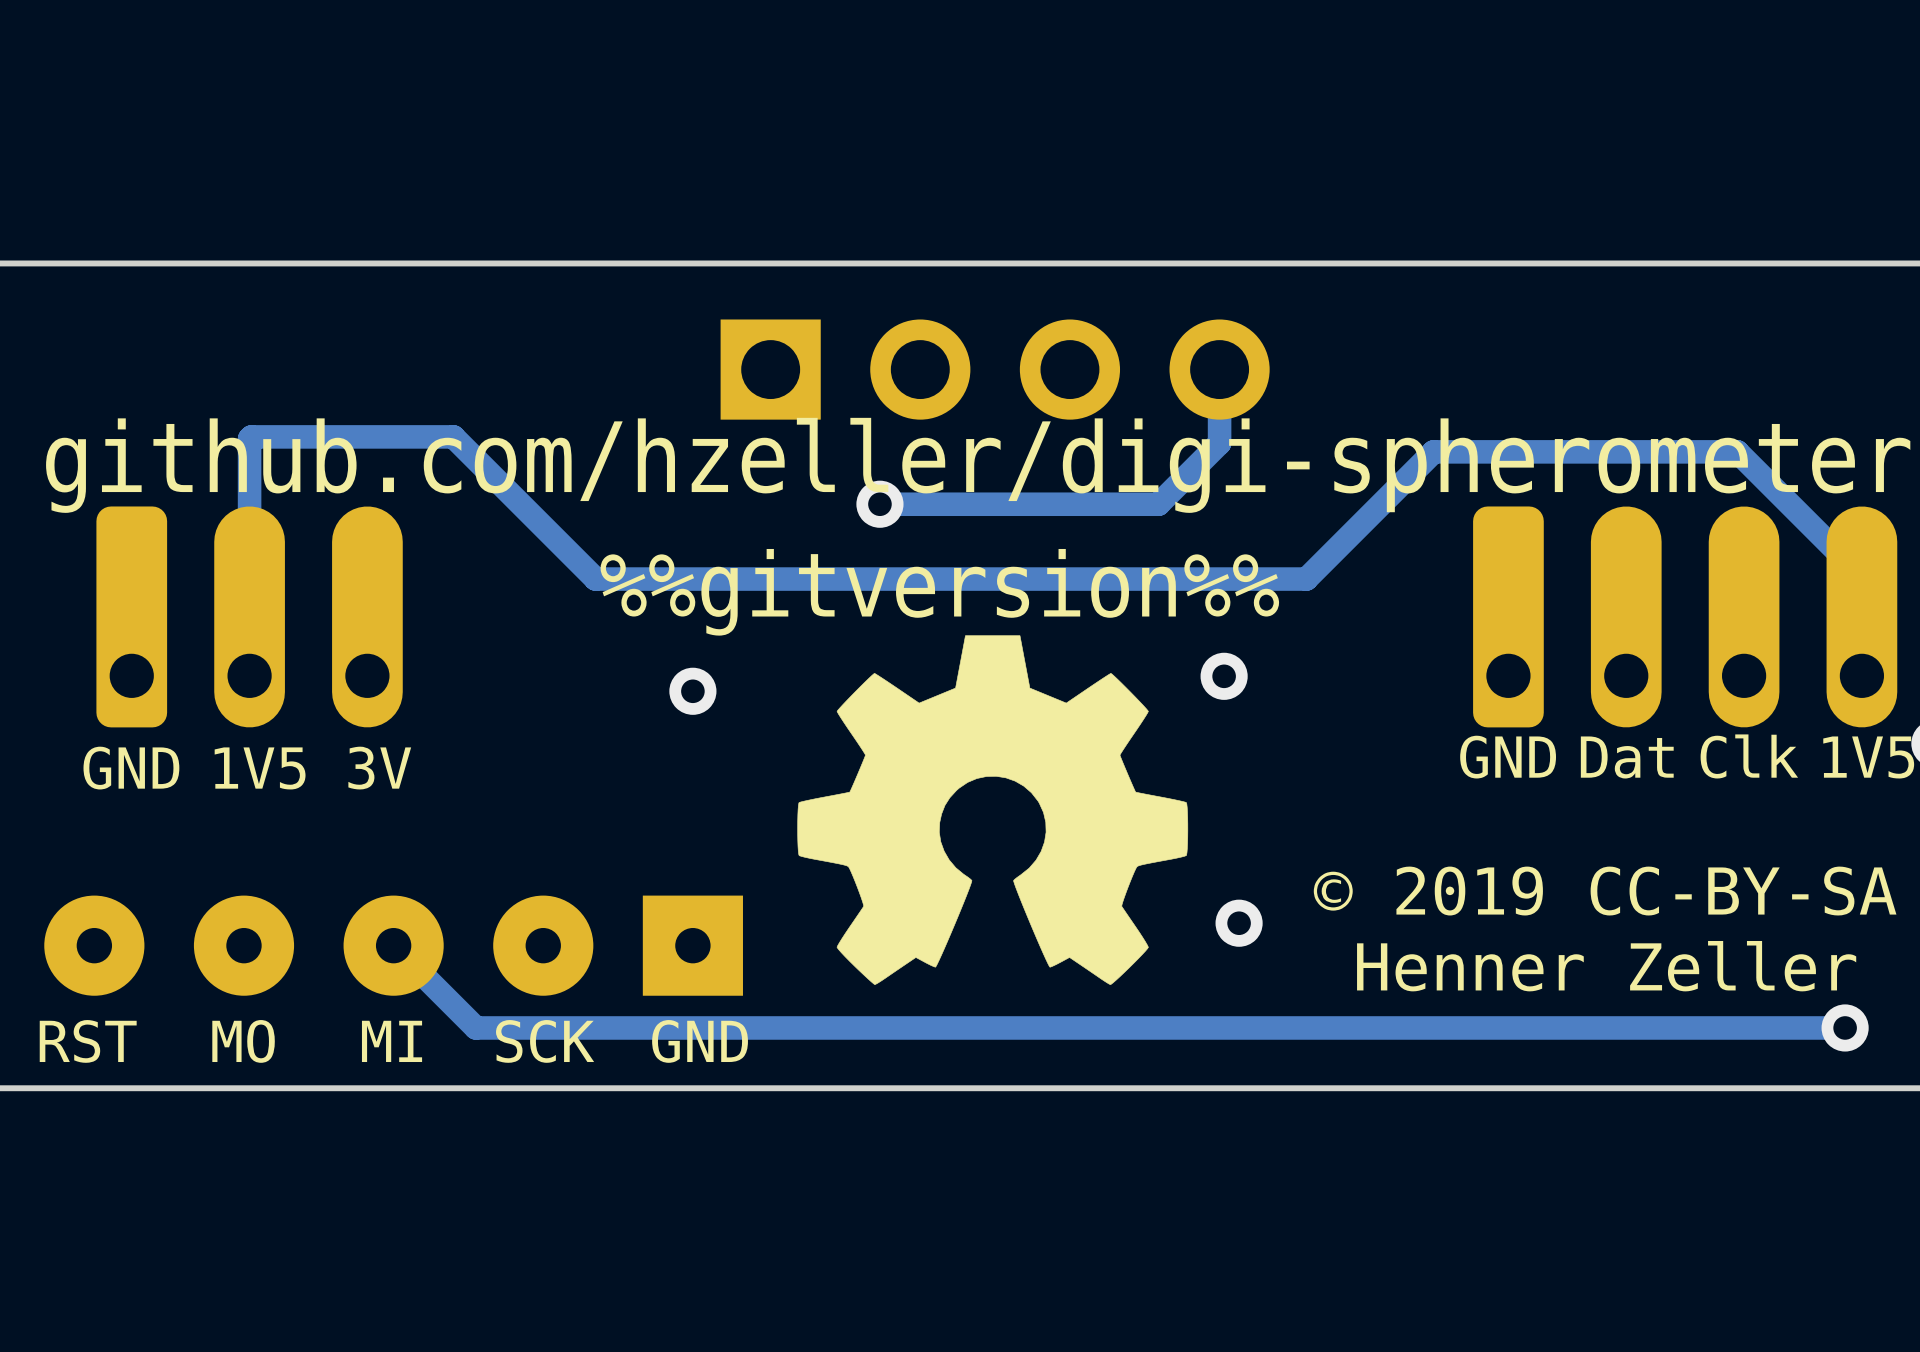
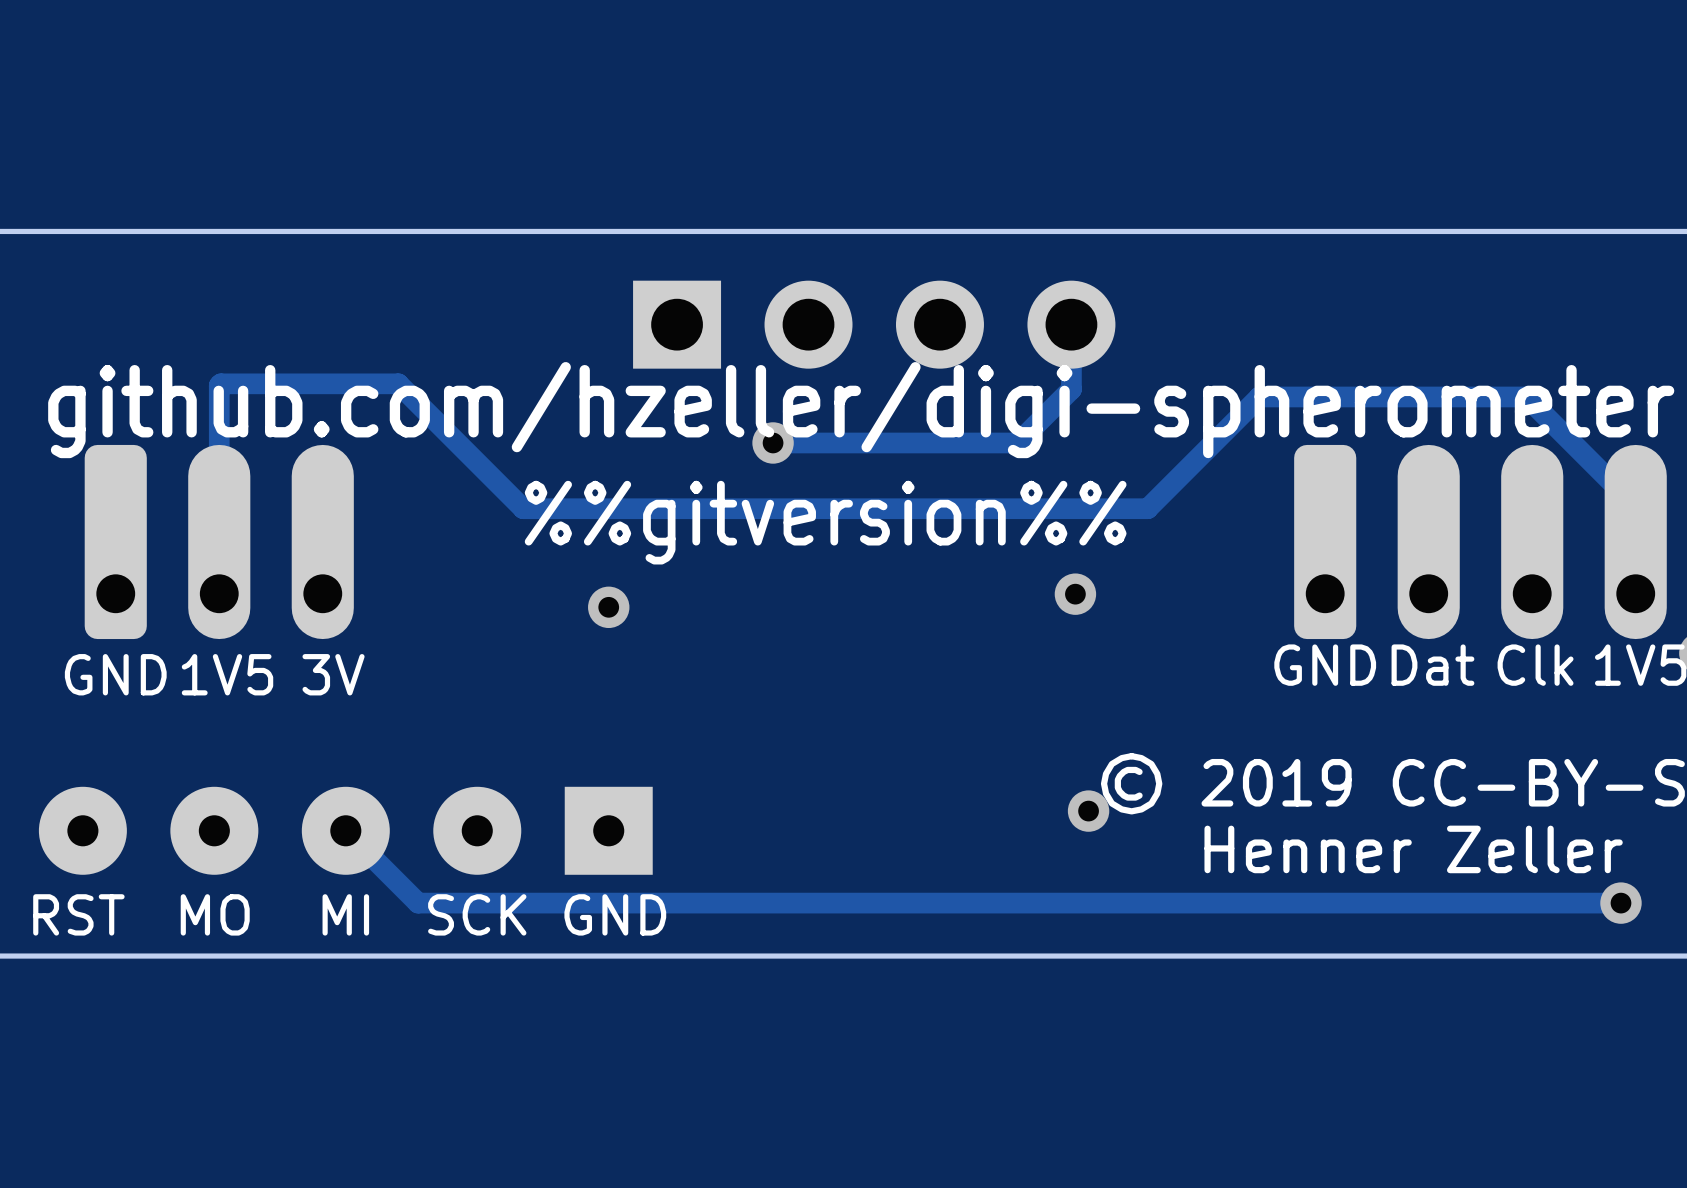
drawing: [797, 635, 1189, 985] -> none

